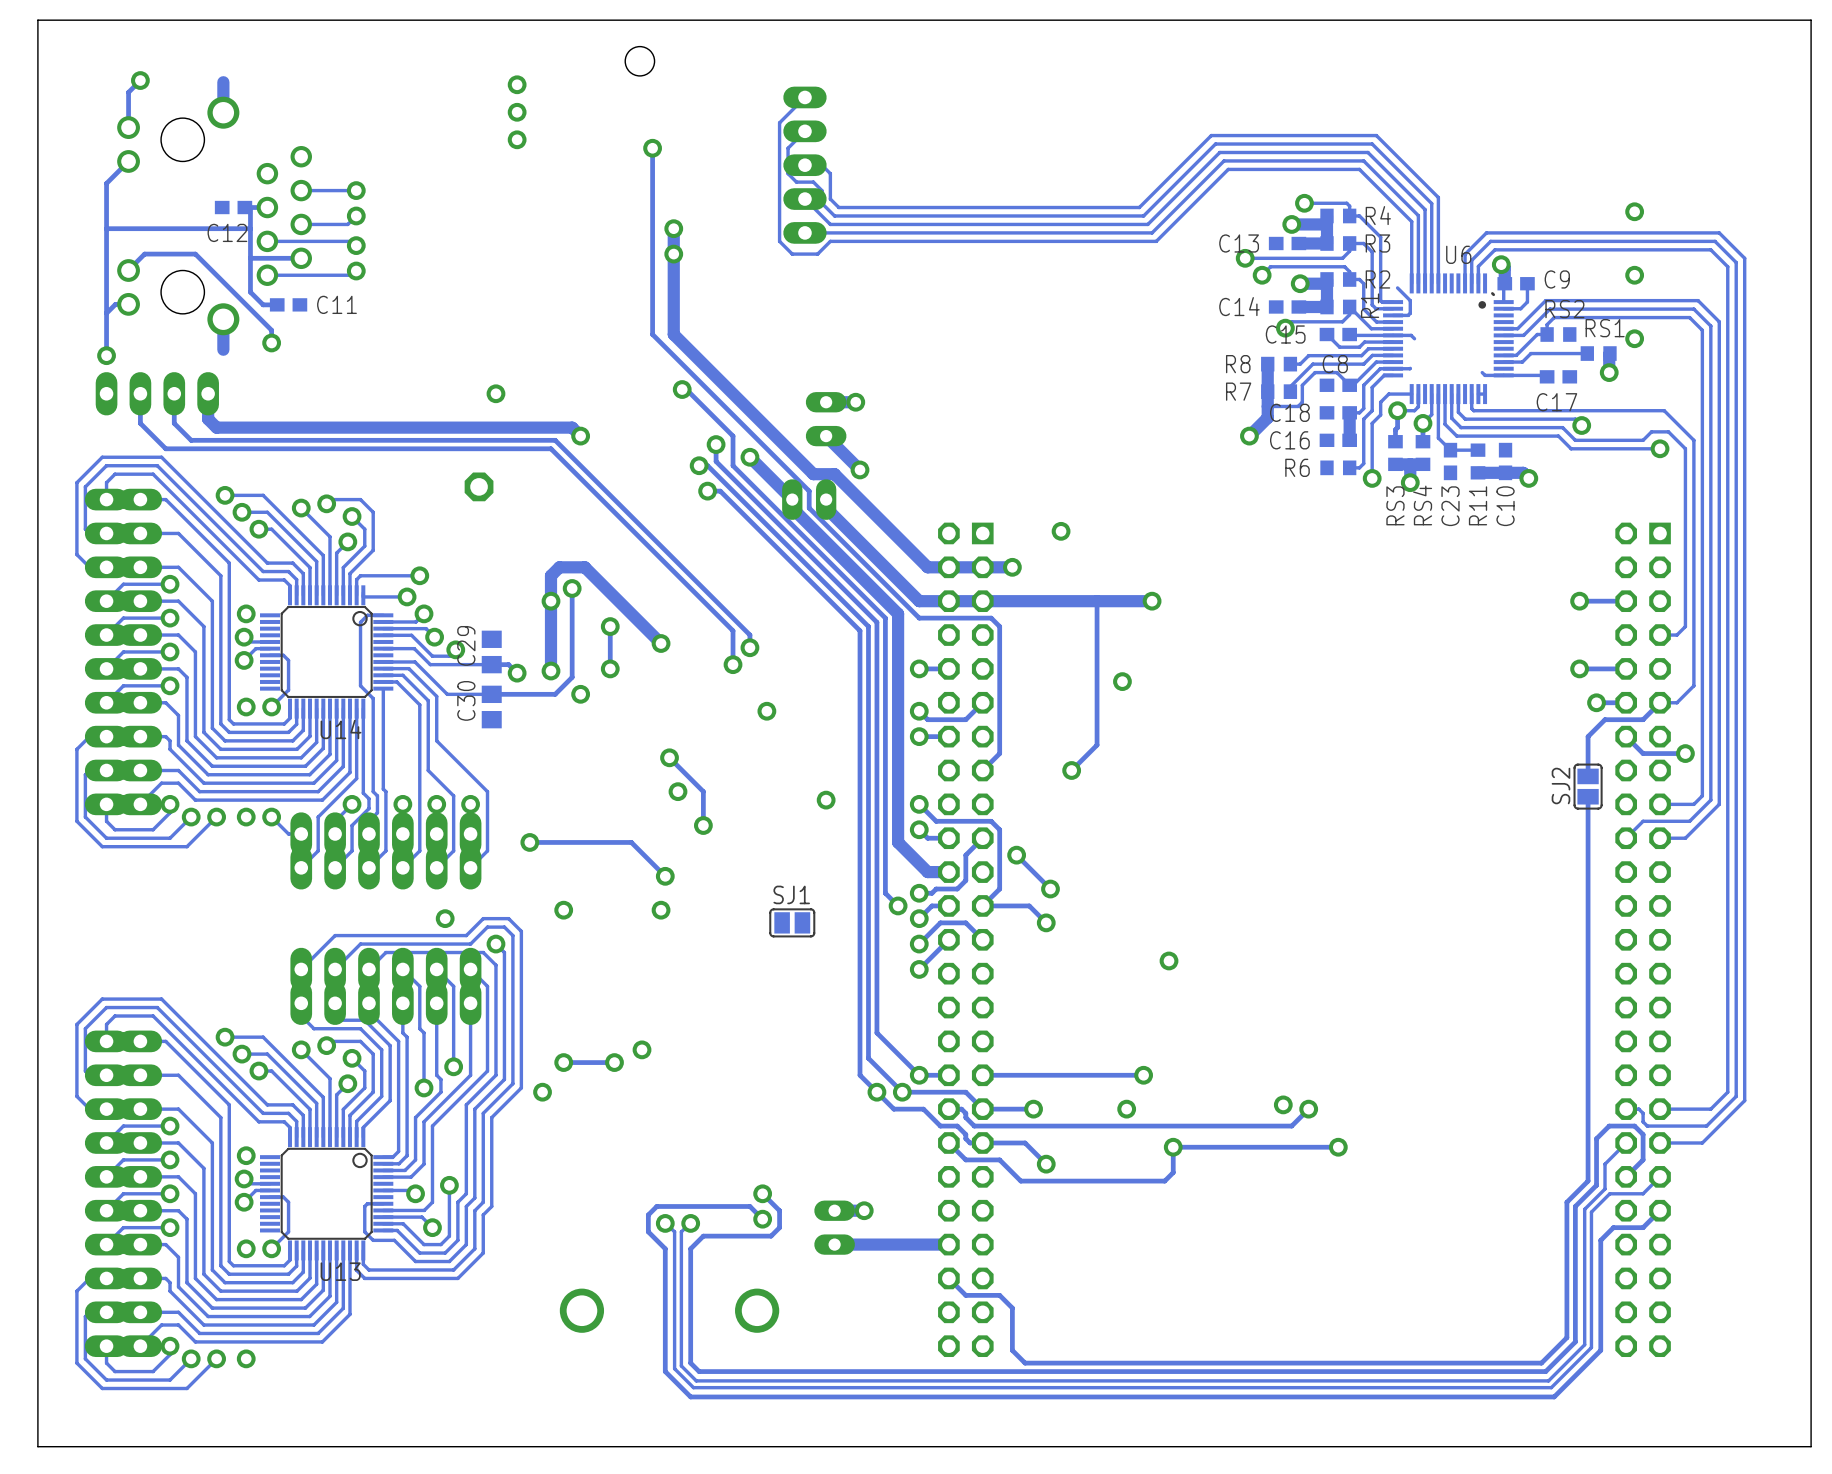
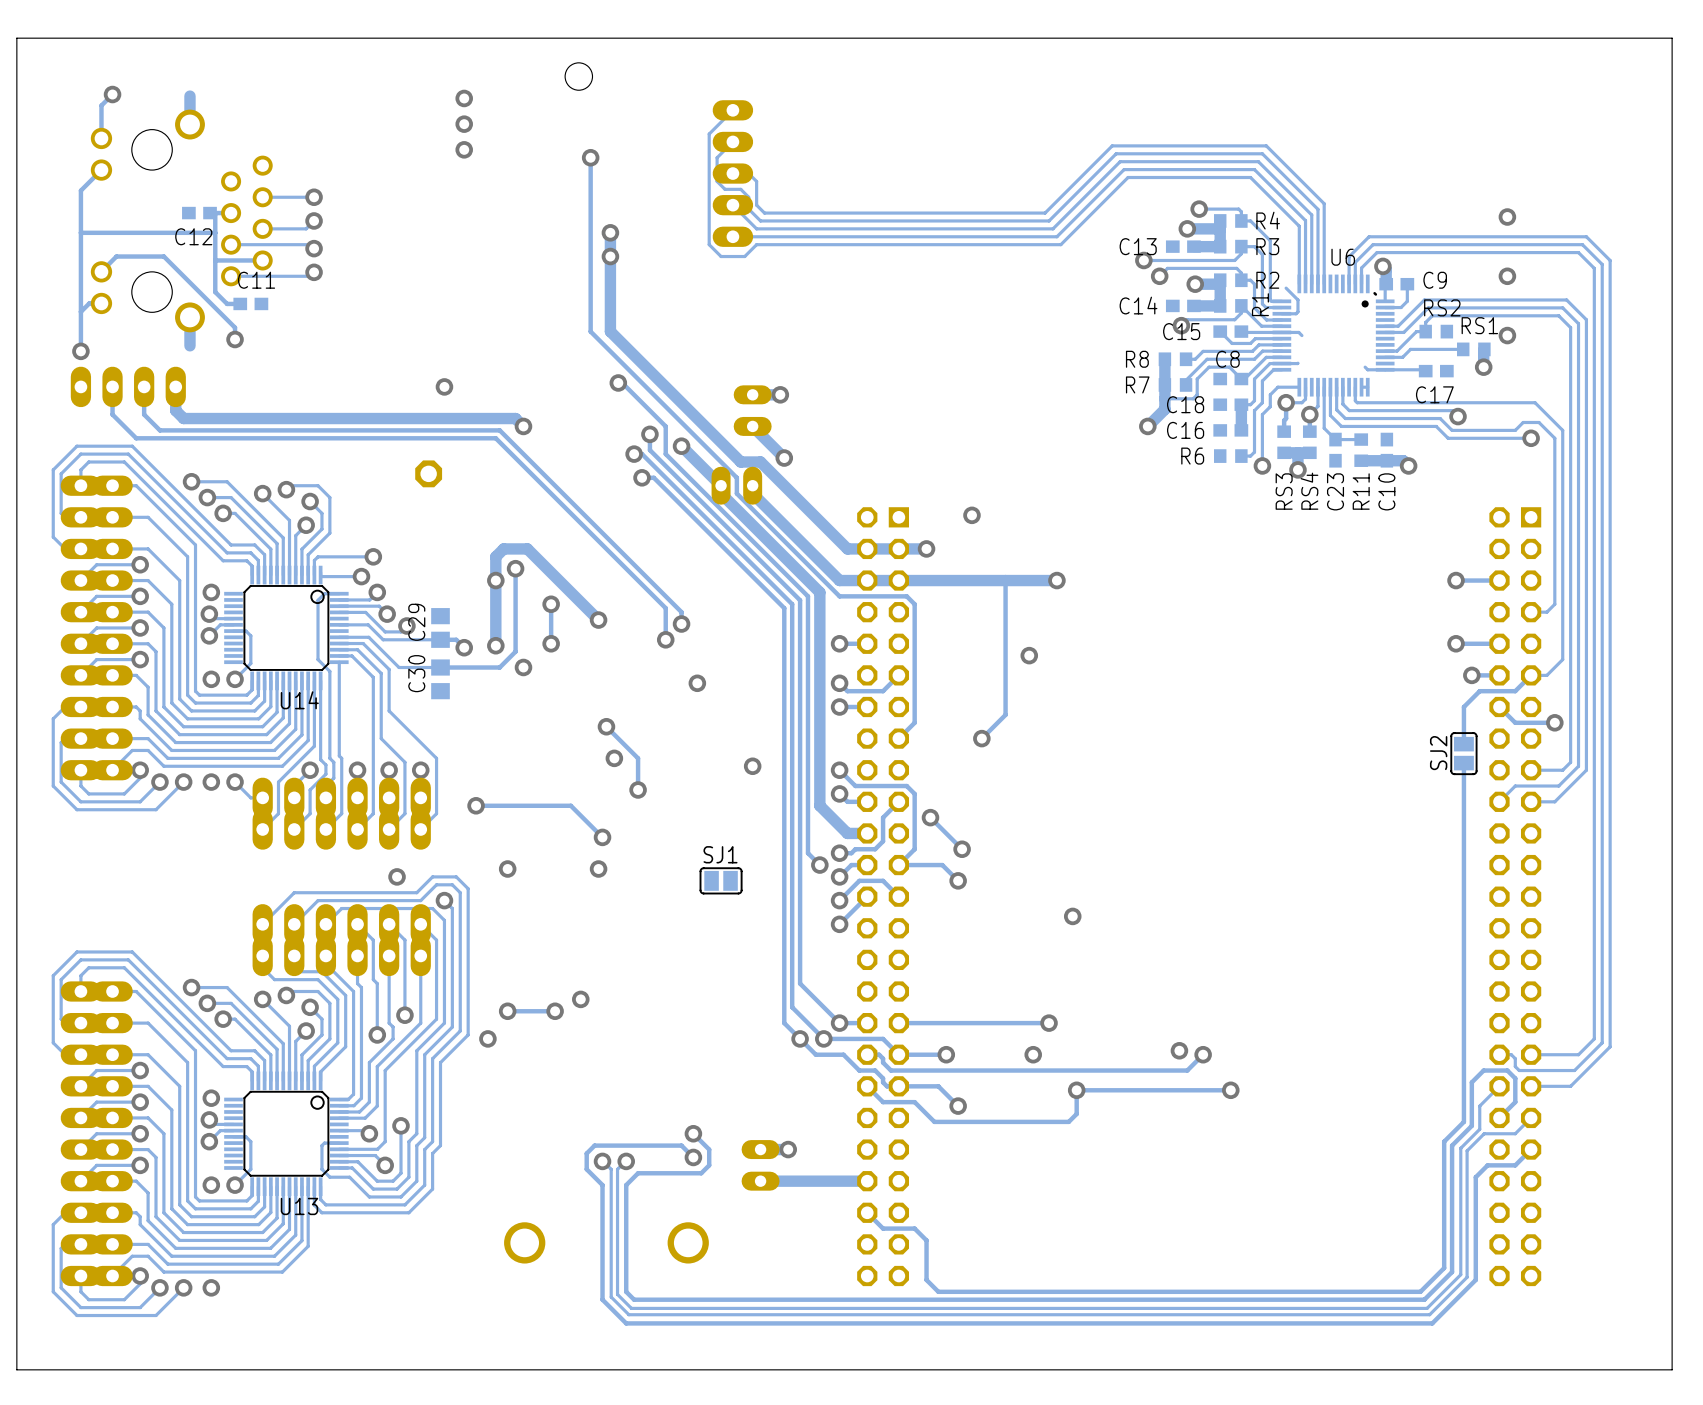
C11 name position: C11 (336, 304) -> C11 (256, 280)

